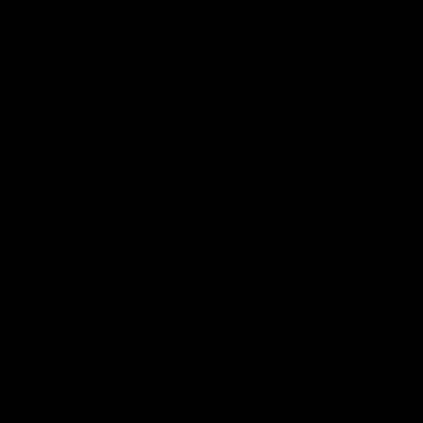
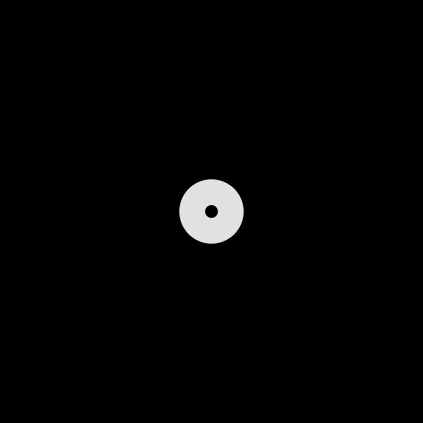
part: none -> (211, 211)

